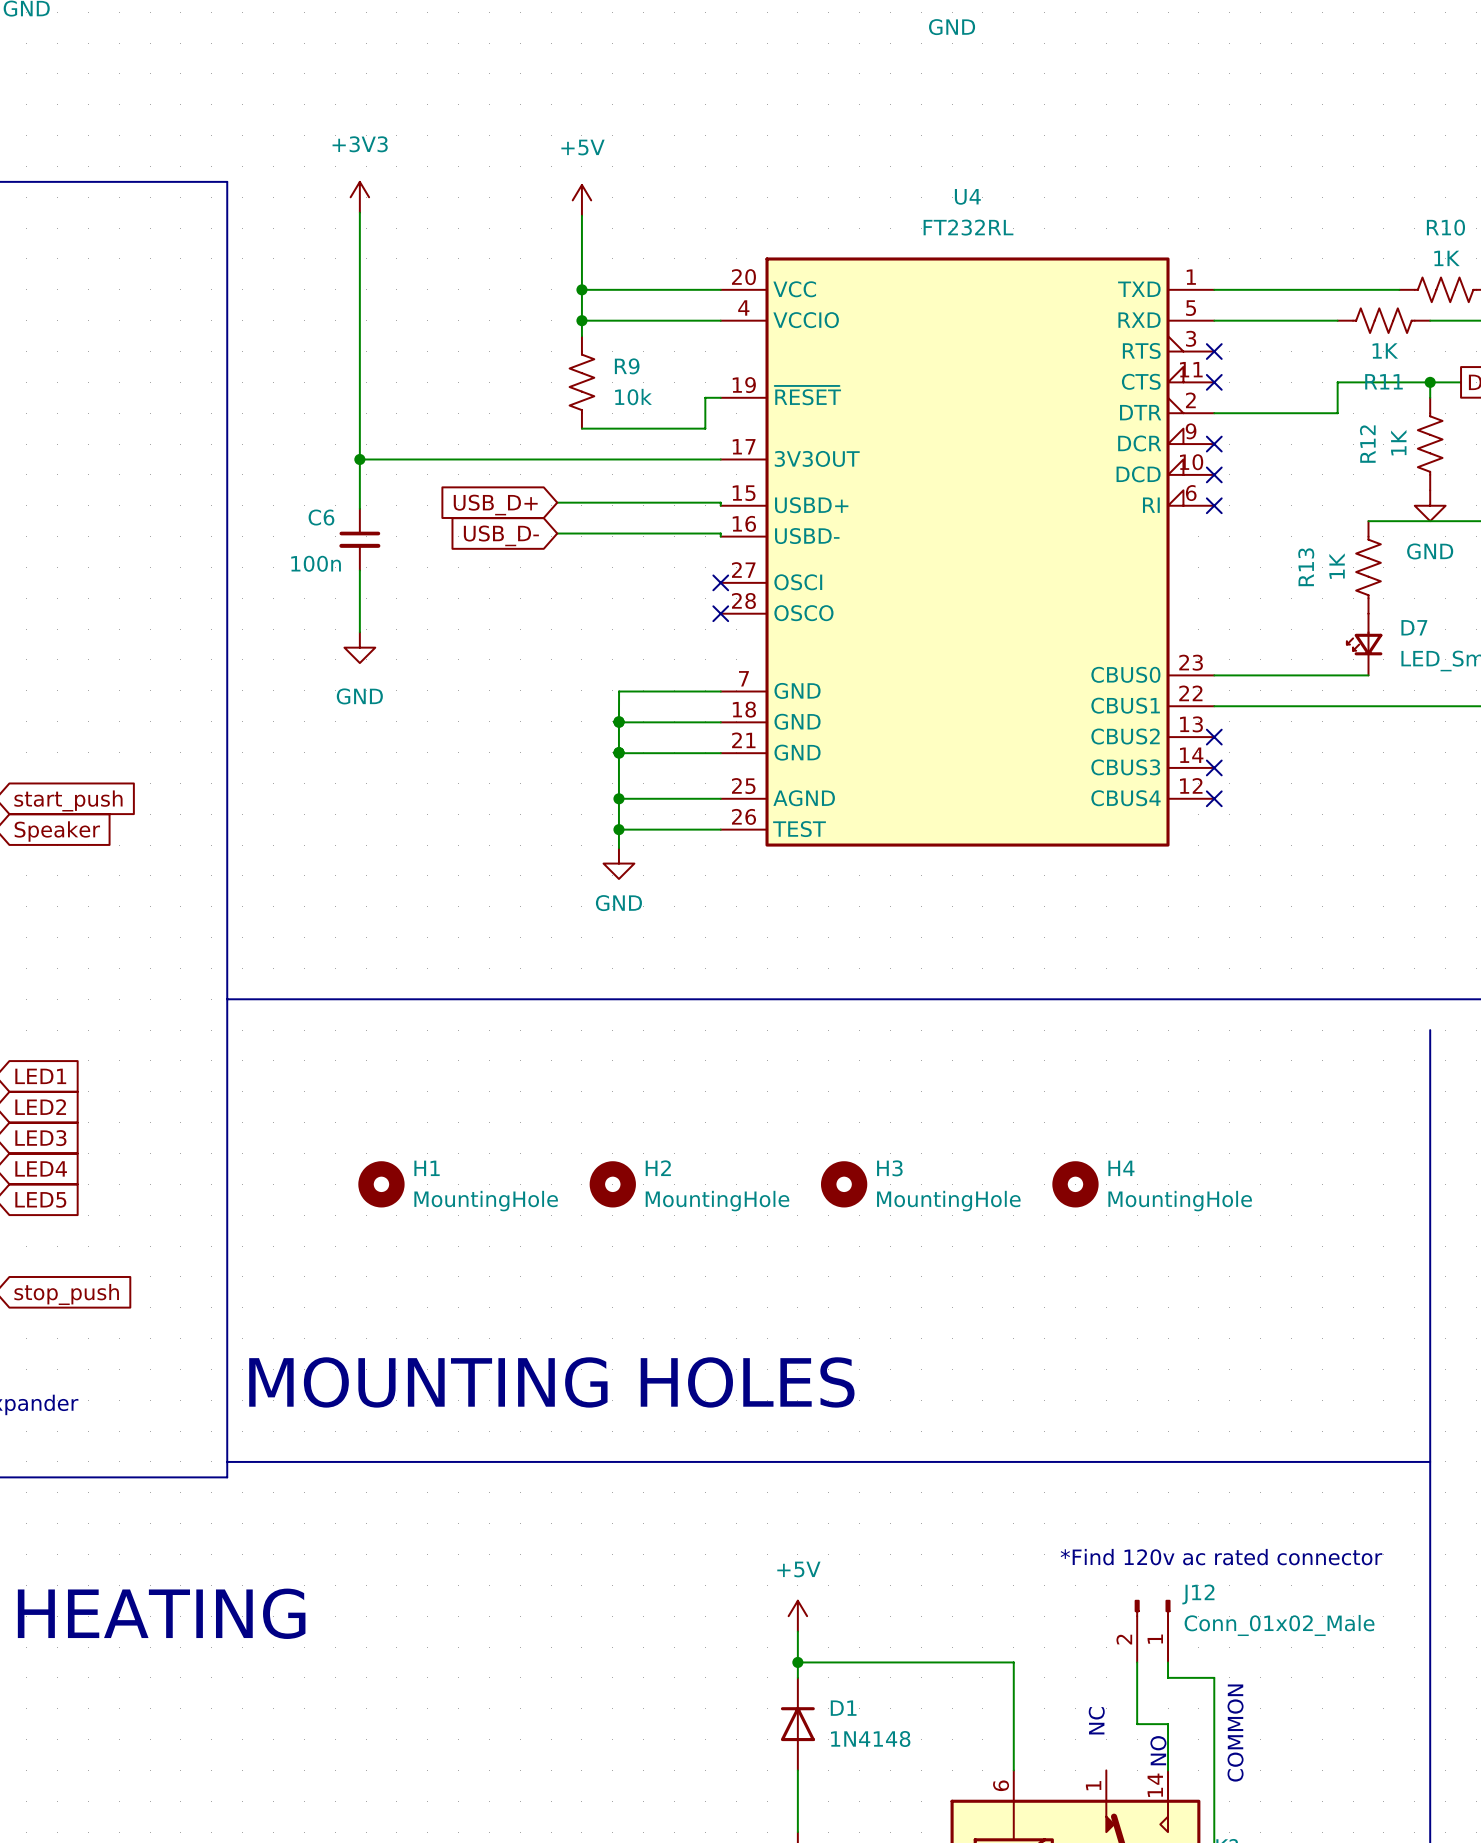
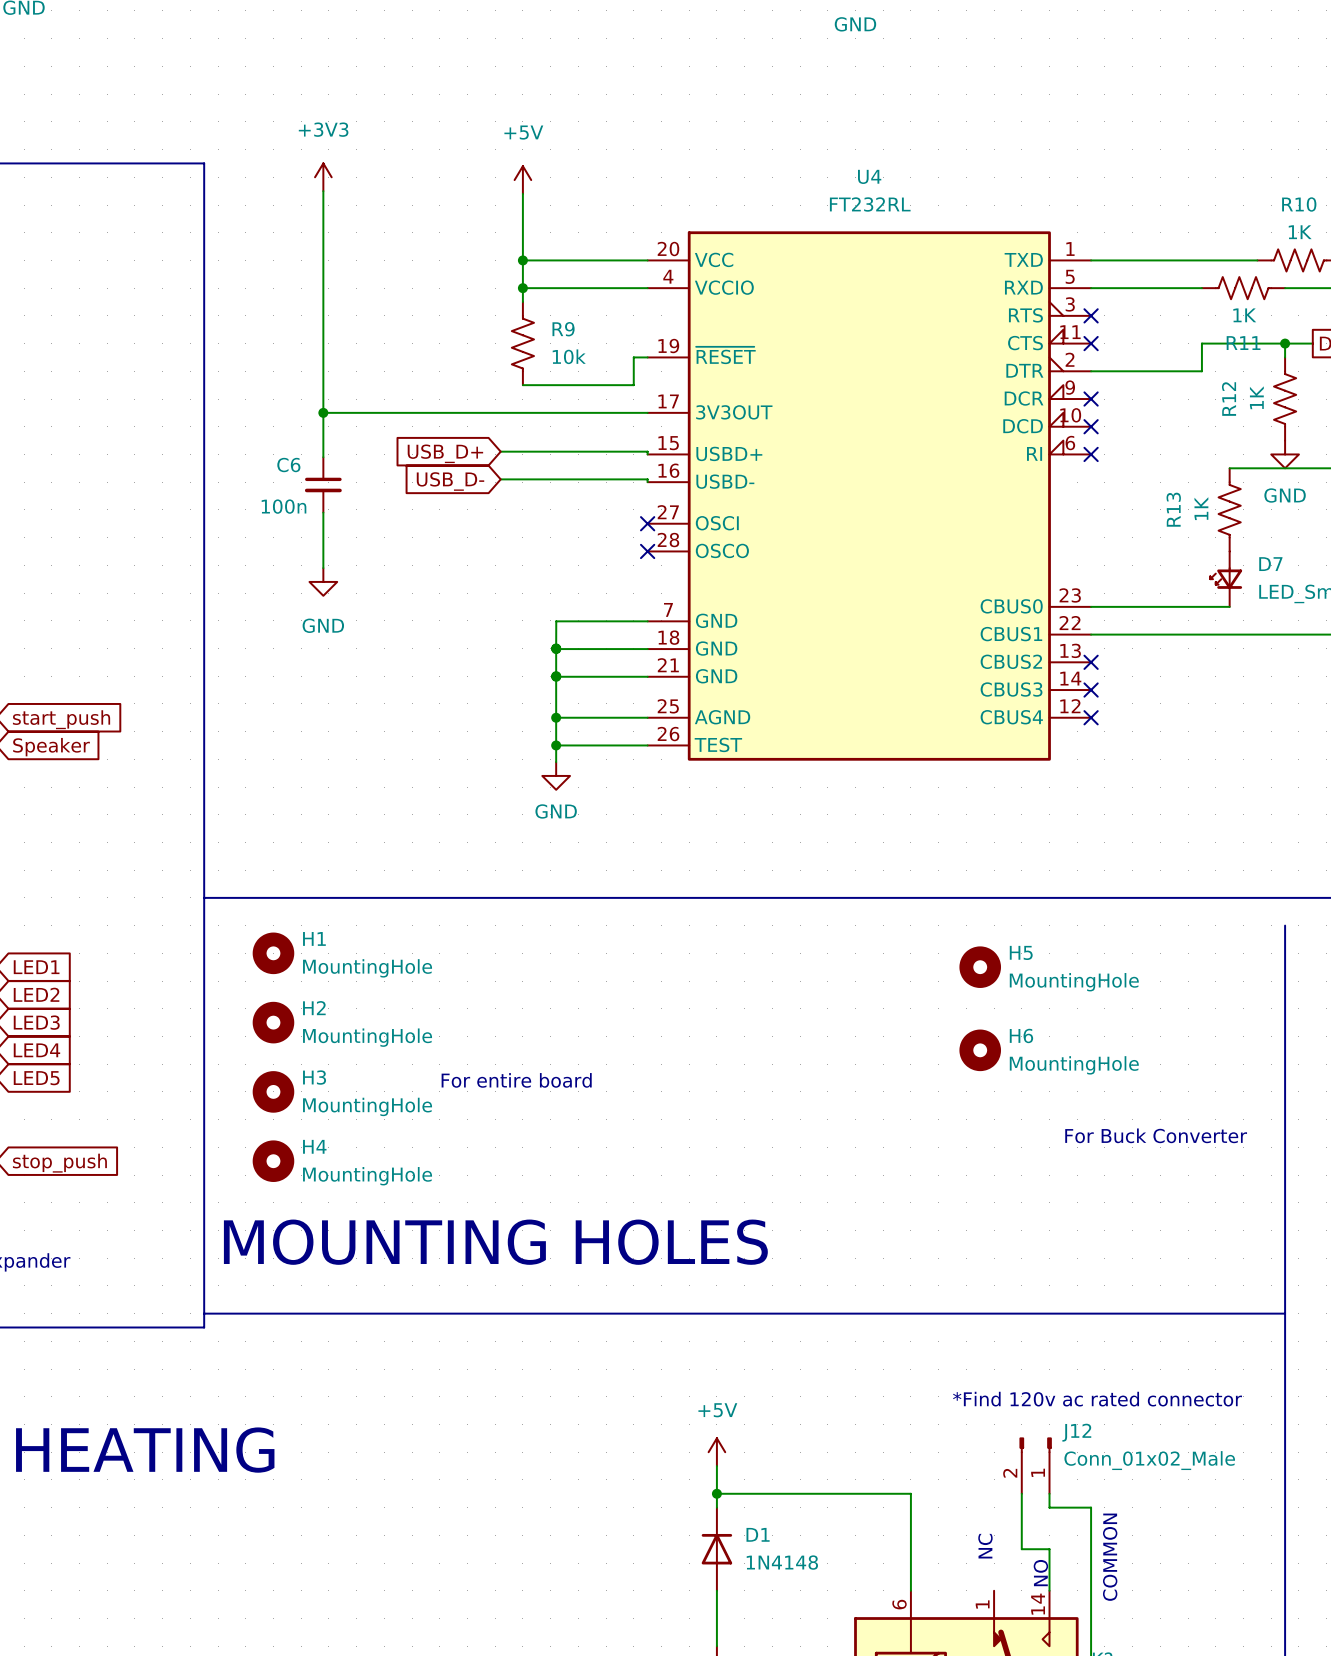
H5: none -> MountingHole (980, 967)
H6: none -> MountingHole (980, 1050)
H1 position: (381, 1184) -> (273, 953)
H2 position: (612, 1184) -> (273, 1022)
H3 position: (844, 1184) -> (273, 1091)
H4 position: (1075, 1184) -> (273, 1161)
text: none -> For entire board (516, 1080)
text: none -> For Buck Converter (1156, 1135)

